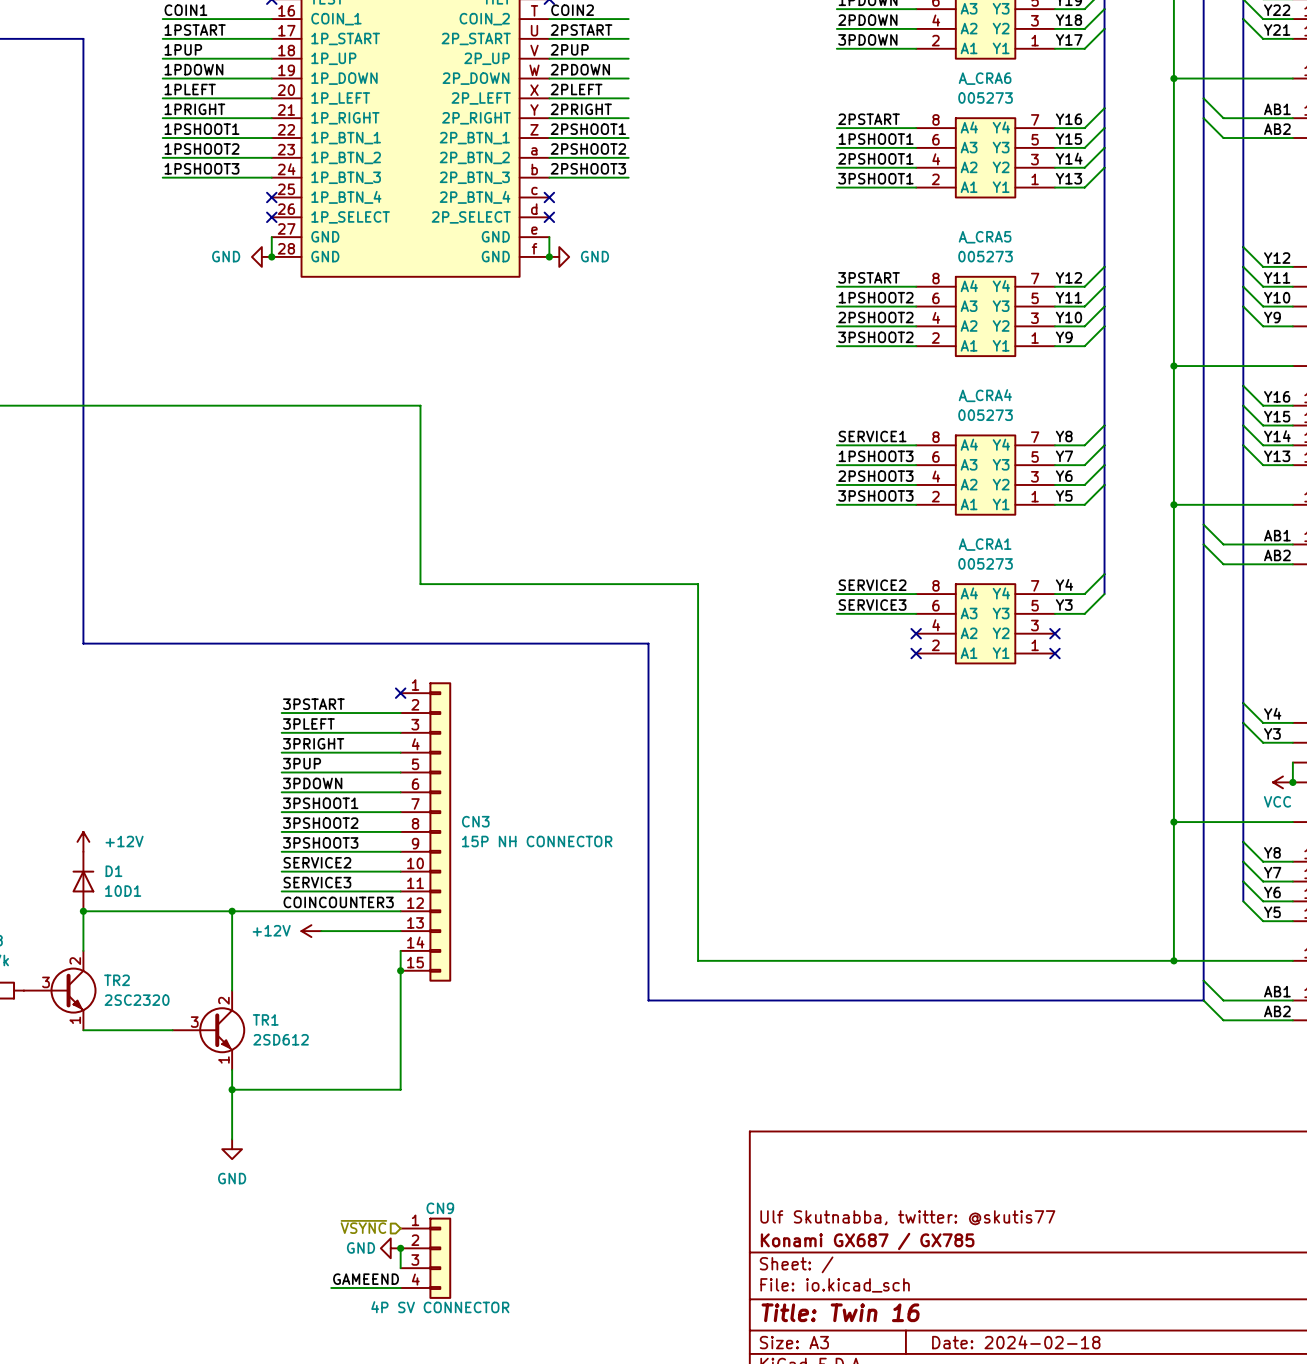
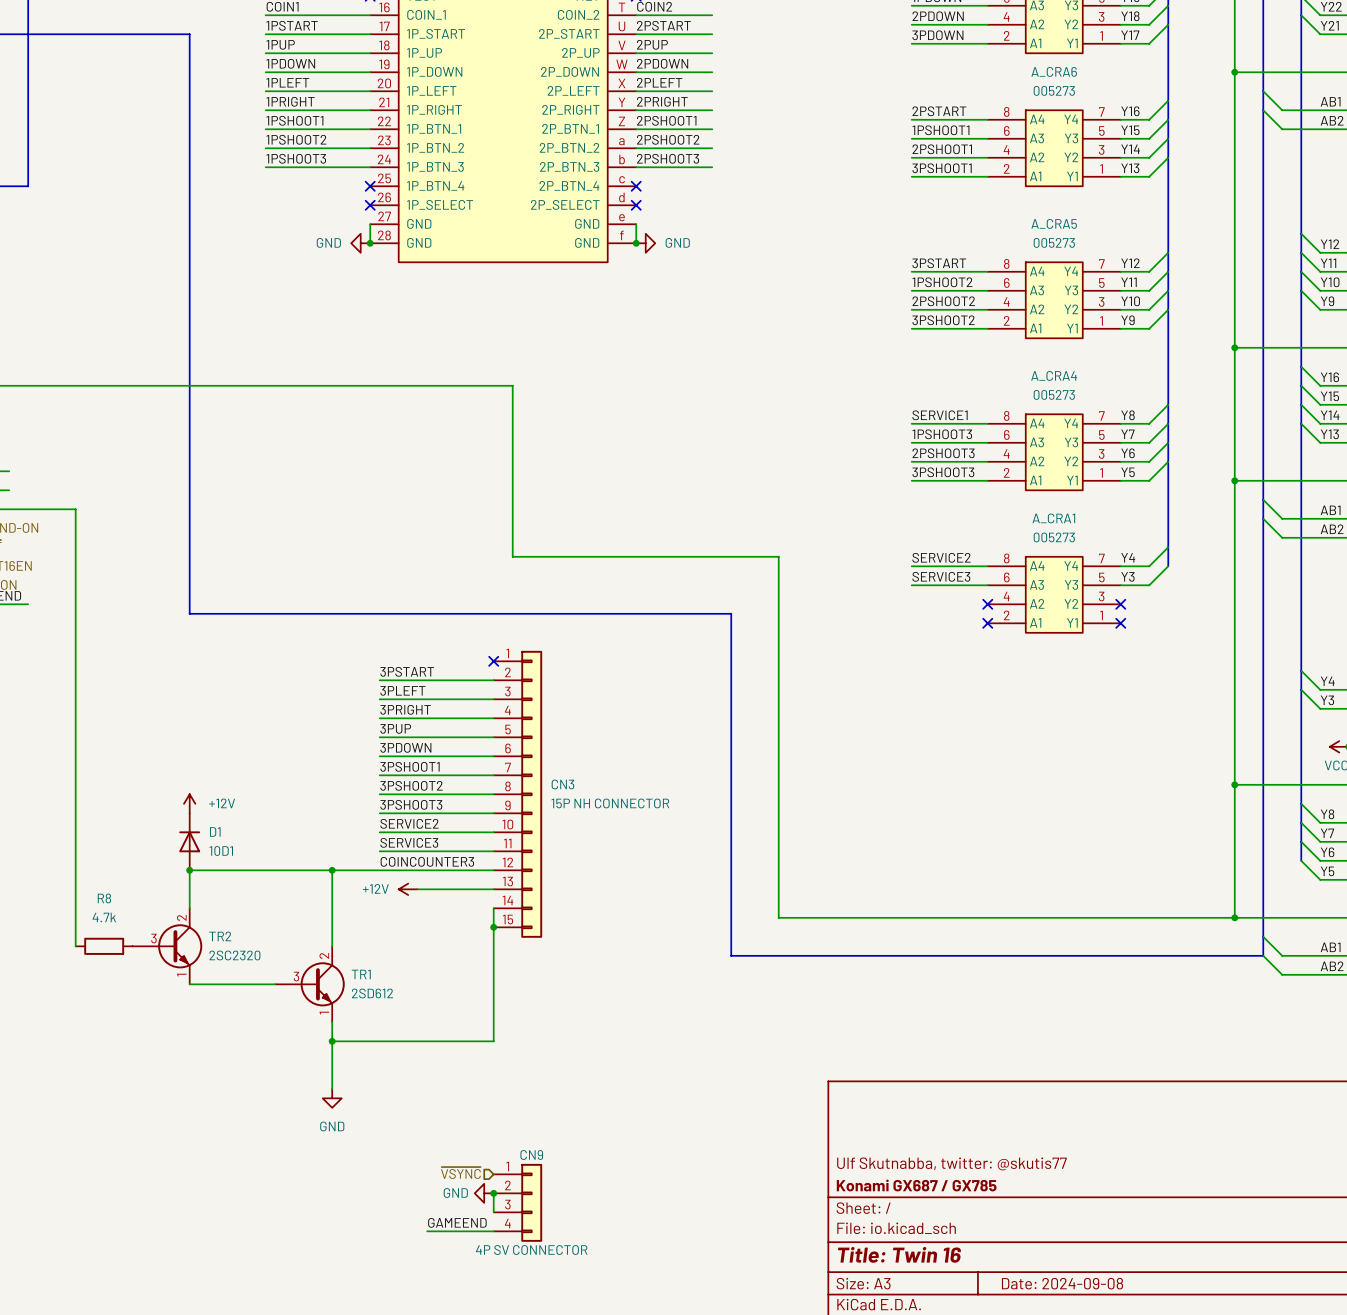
title block: Date: 2024-02-18 (1016, 1342) -> Date: 2024-09-08 (1062, 1283)

